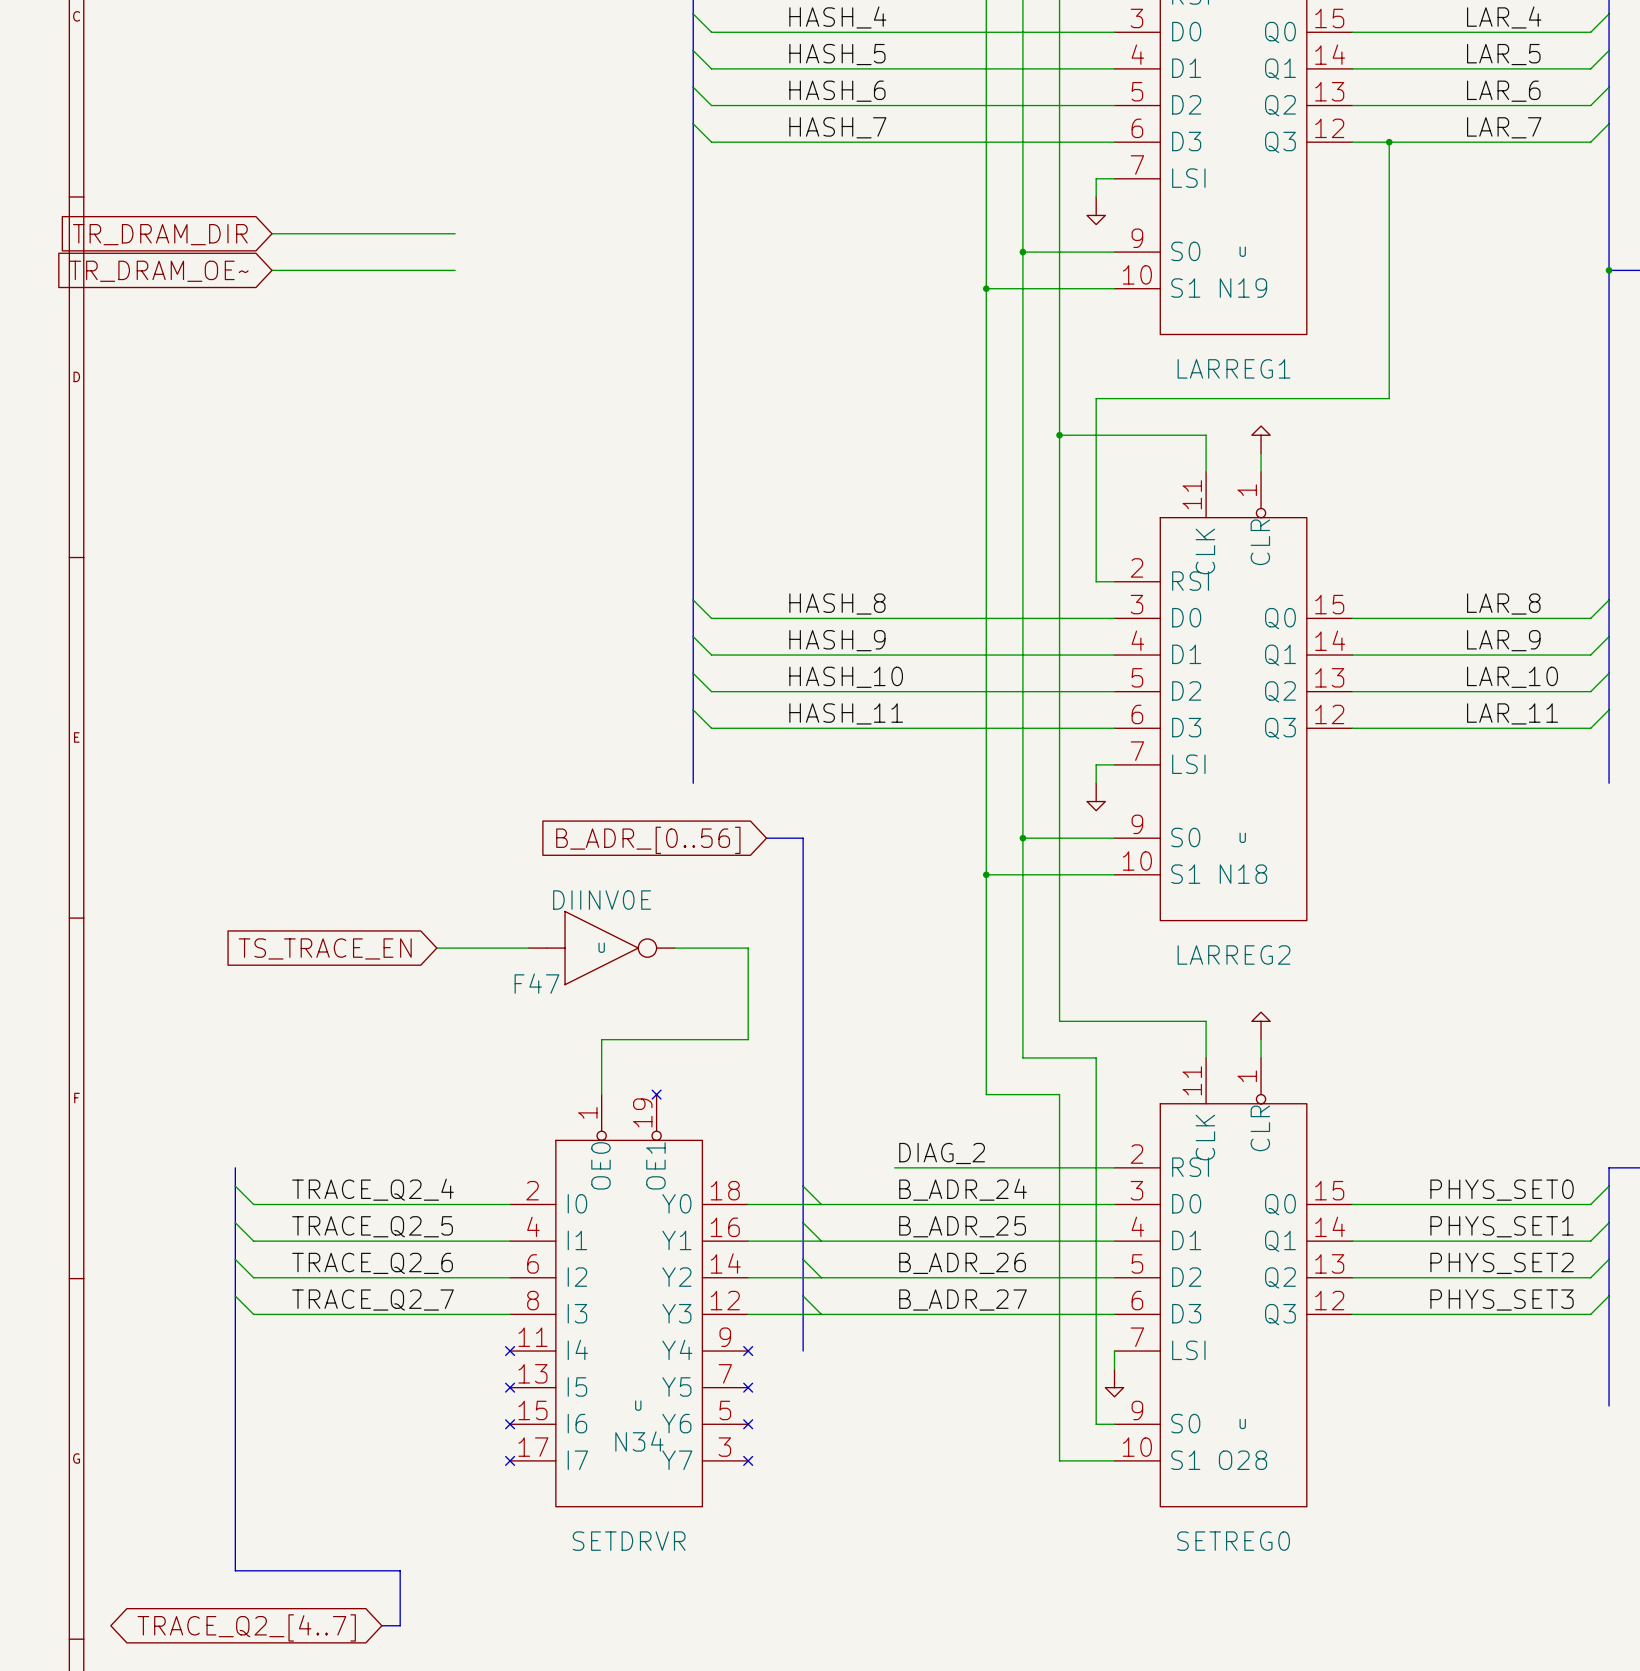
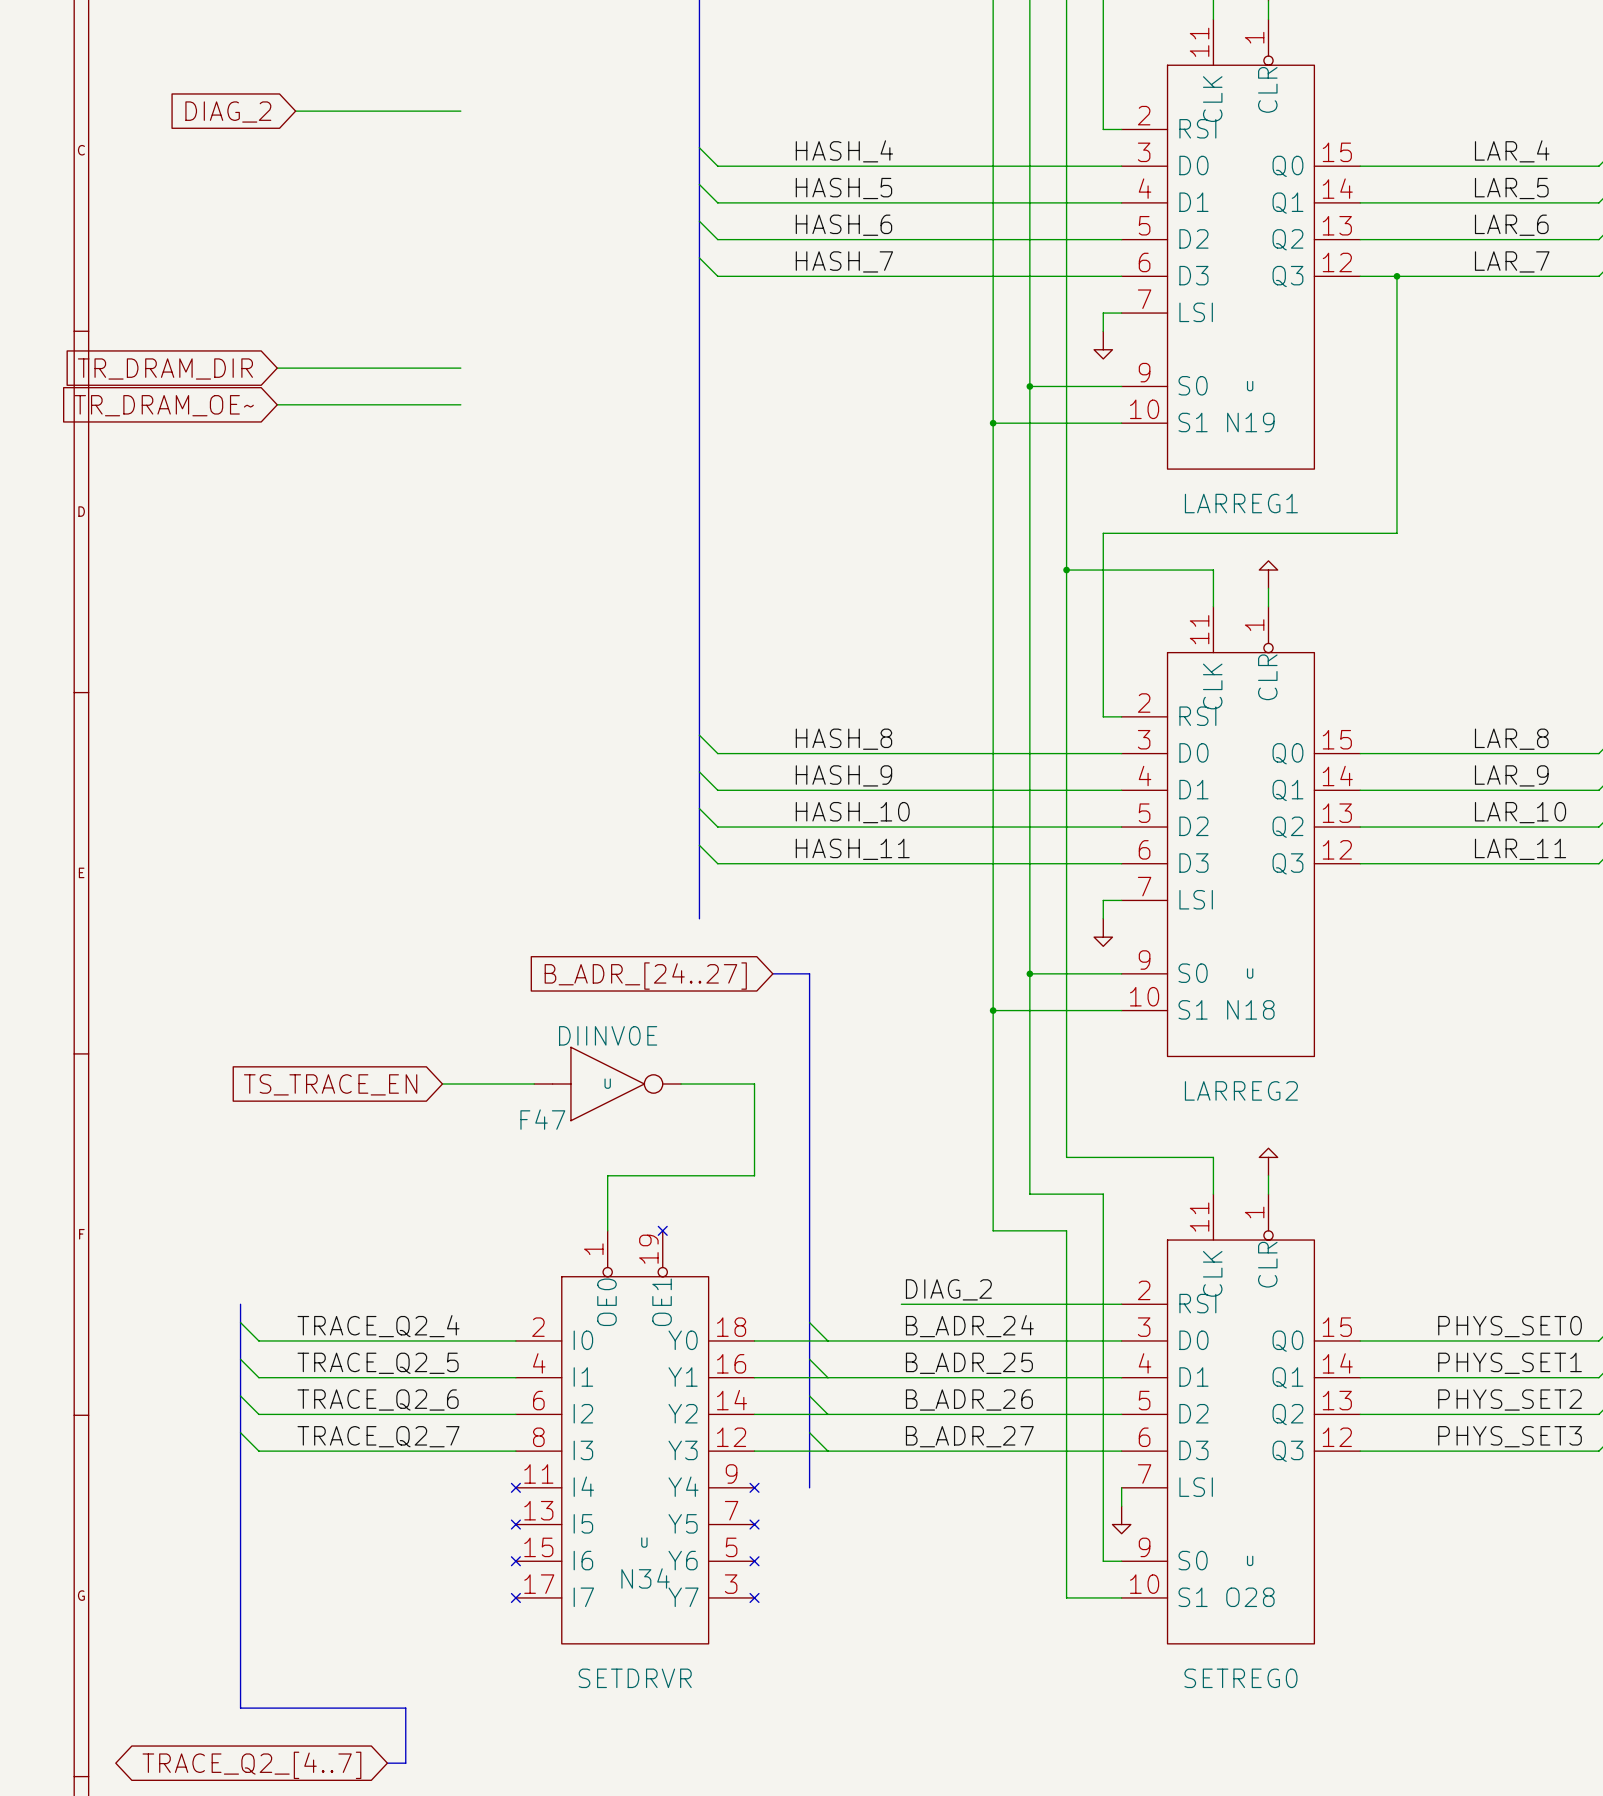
global label: B_ADR_[0..56] (648, 840) -> B_ADR_[24..27] (645, 976)

